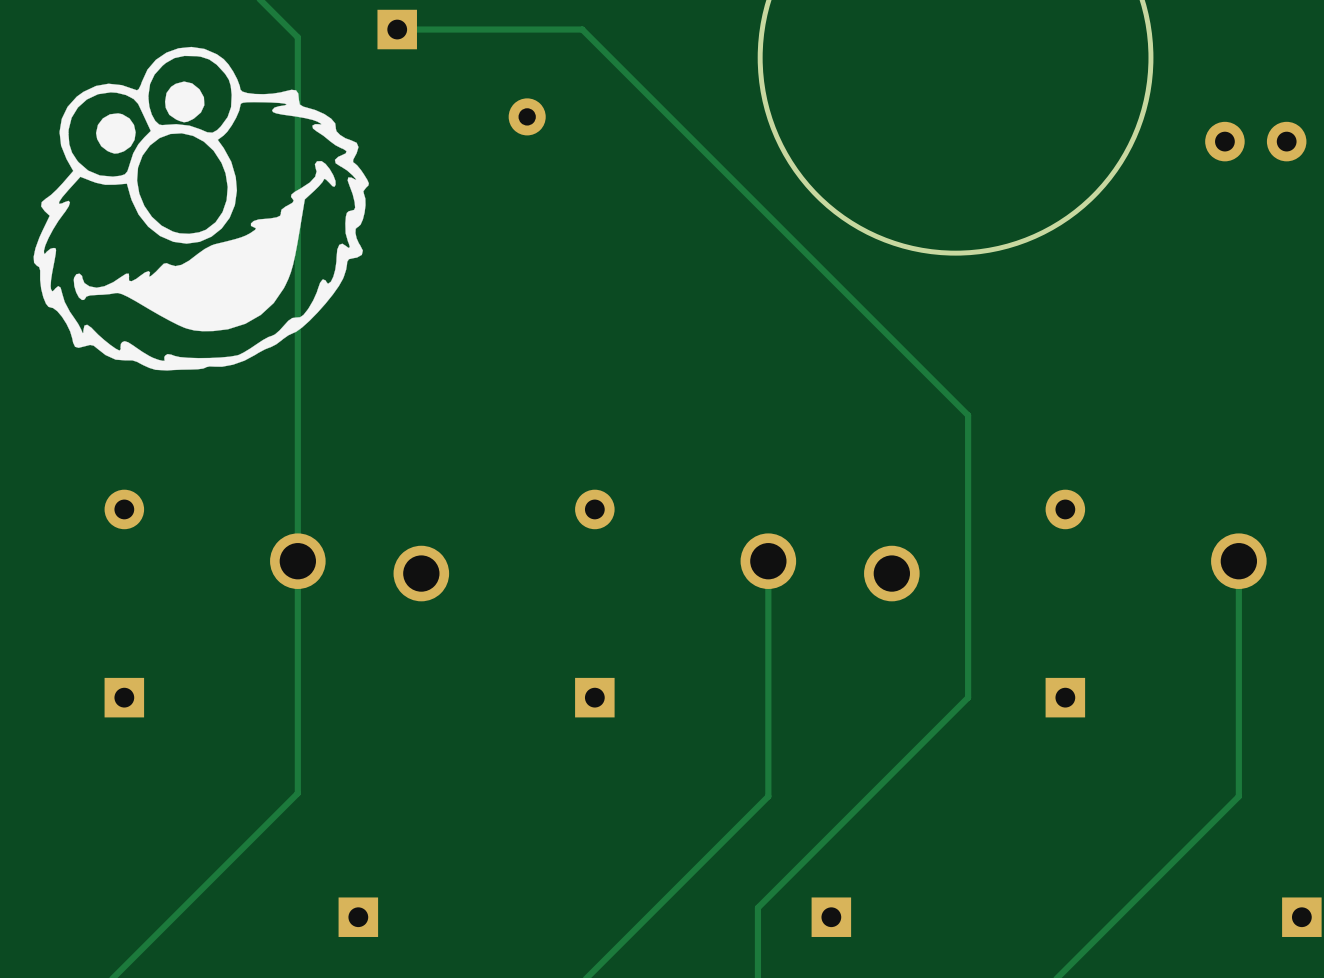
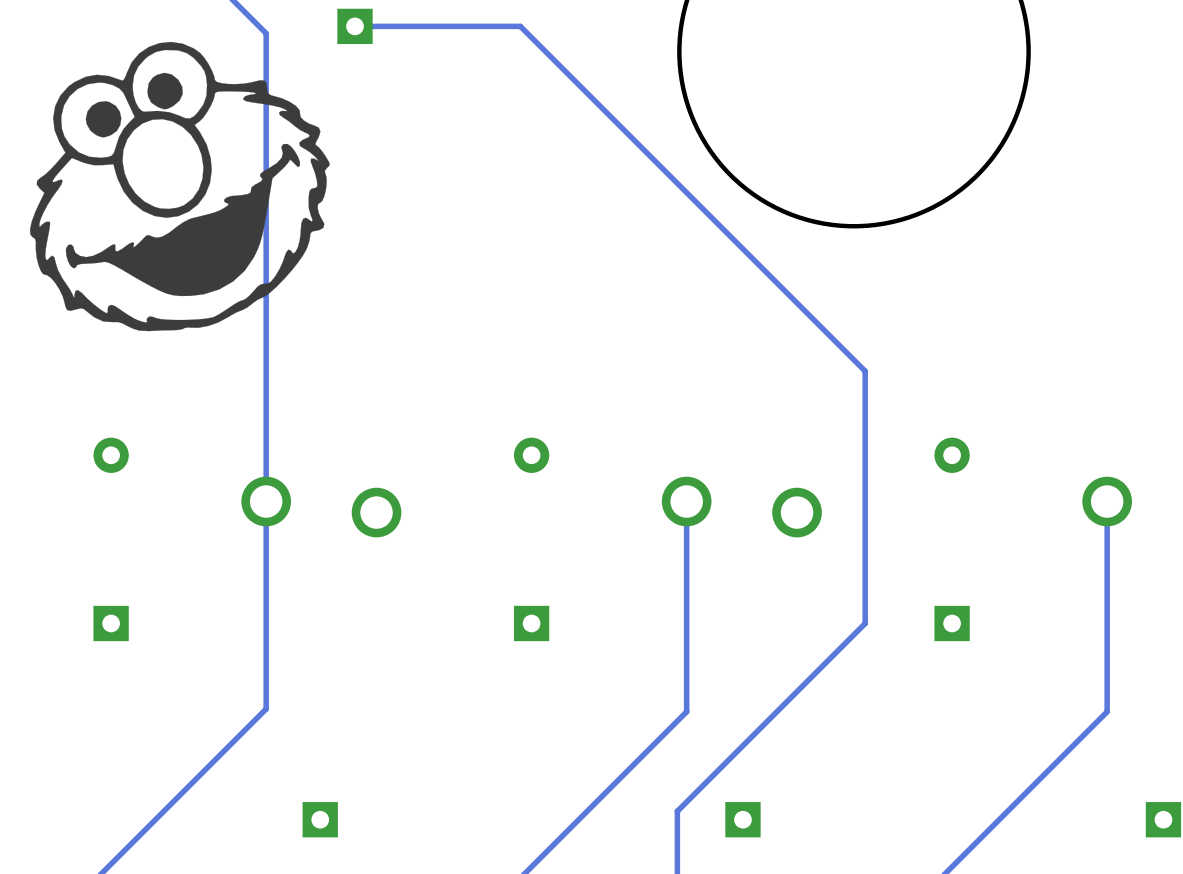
part: (527, 116) -> none
part: (1255, 141) -> none

